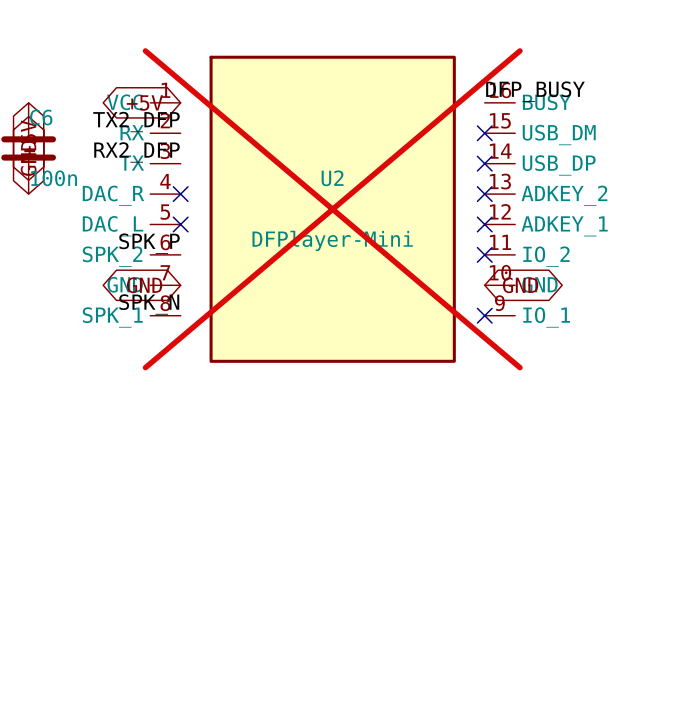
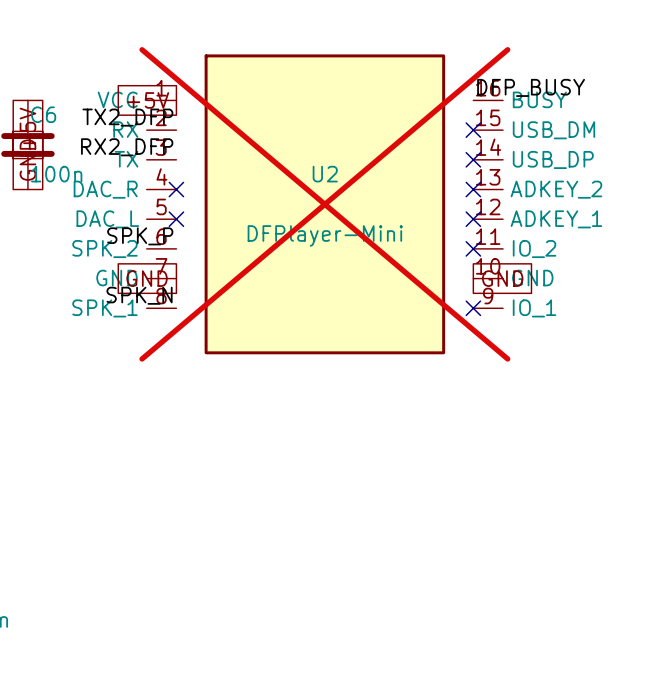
global label shape: bidirectional (144, 103) -> passive (148, 100)
global label shape: bidirectional (28, 138) -> passive (27, 128)
global label shape: bidirectional (28, 158) -> passive (27, 160)
global label shape: bidirectional (144, 285) -> passive (147, 278)
global label shape: bidirectional (520, 285) -> passive (502, 278)

